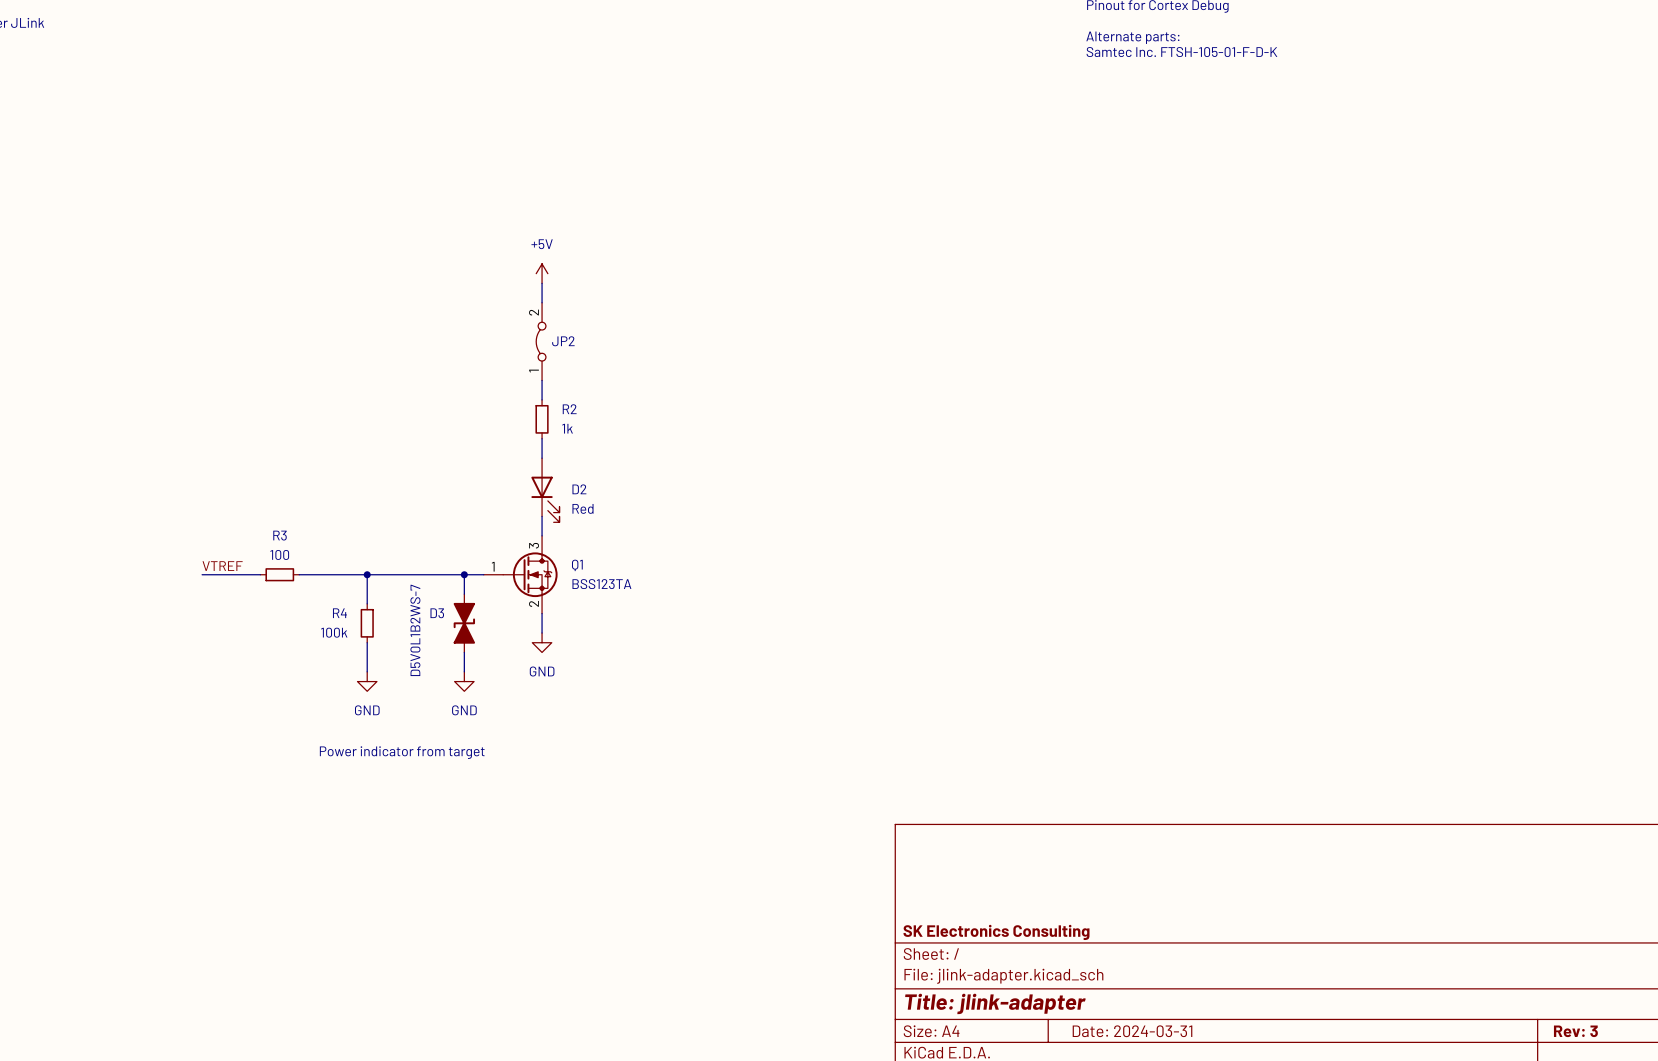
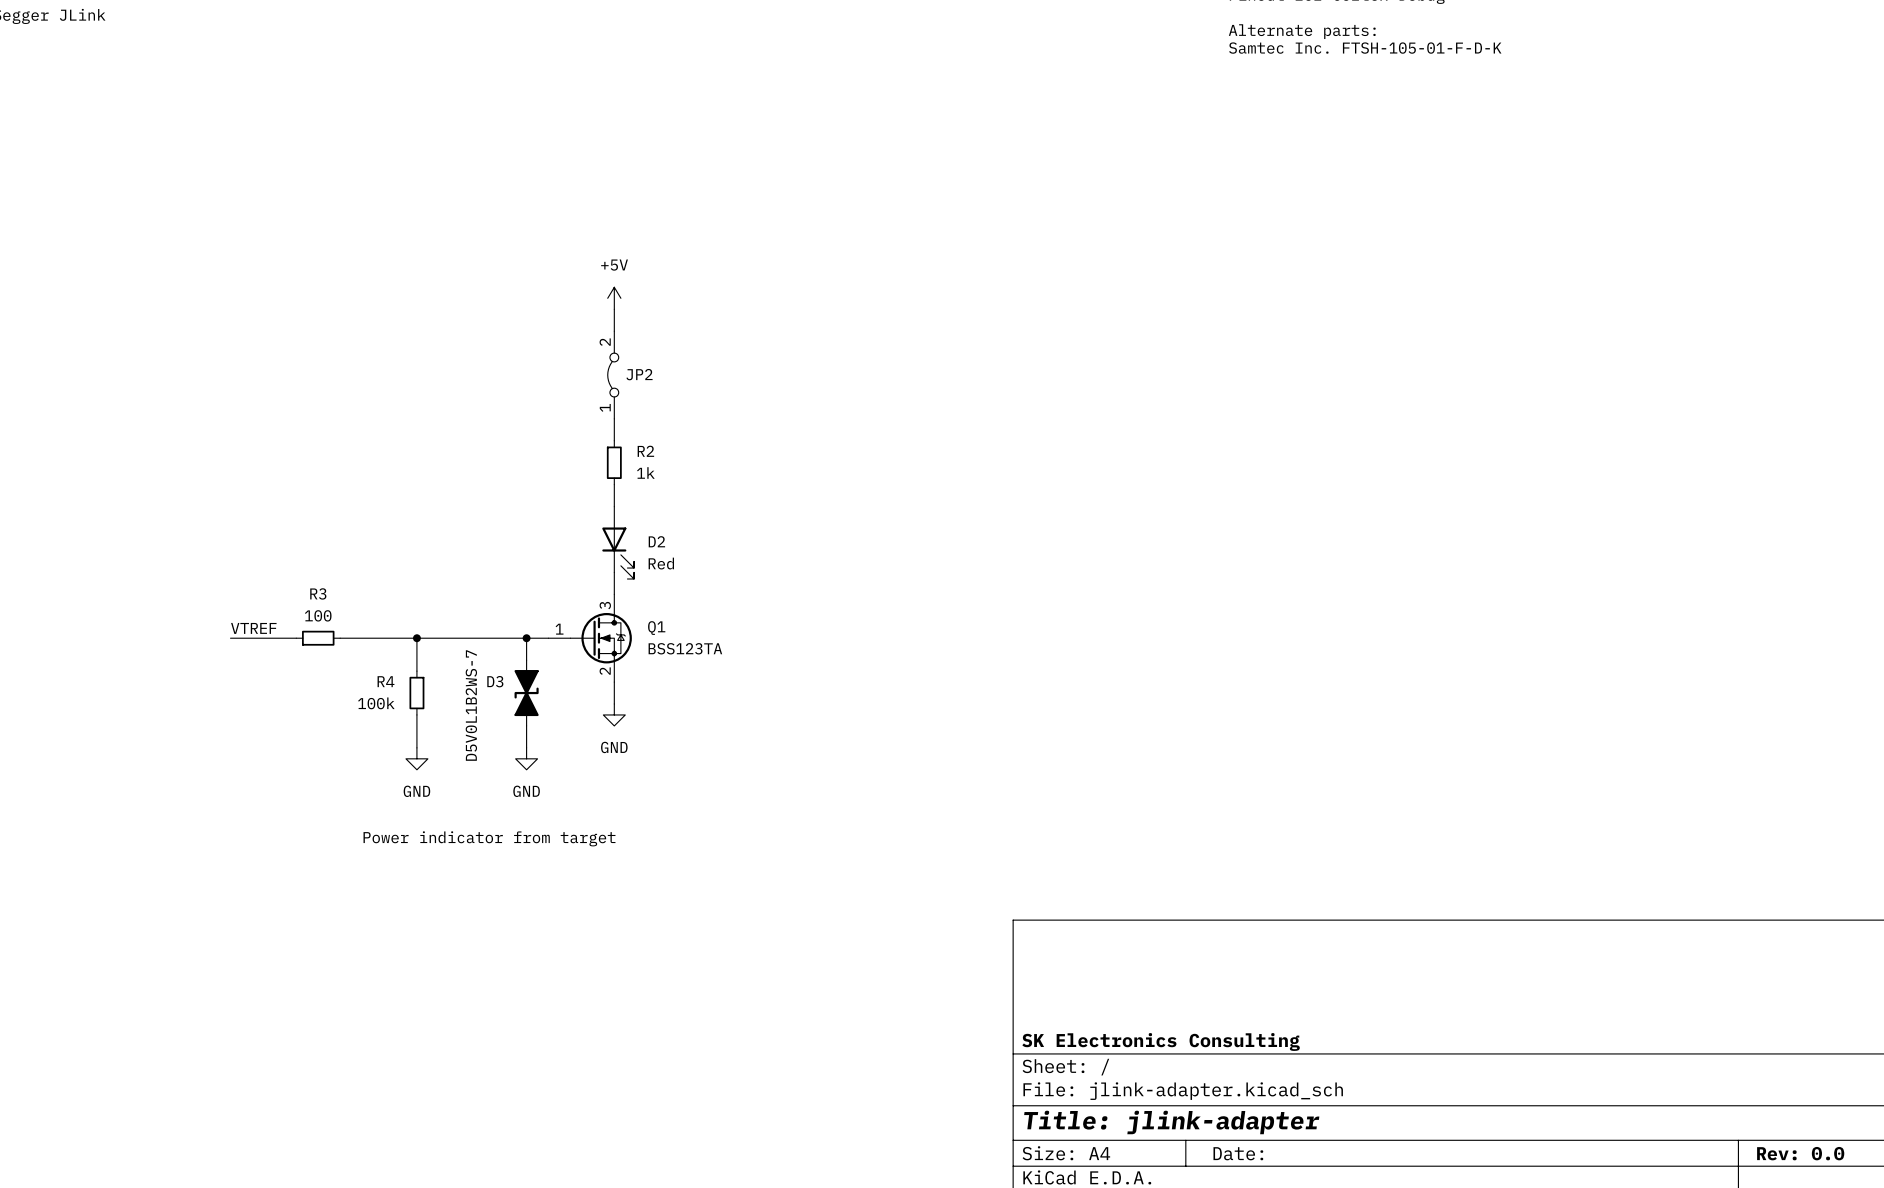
title block: Date: 2024-03-31 (1132, 1031) -> Date: (1238, 1153)
title block: Rev: 3 (1575, 1031) -> Rev: 0.0 (1800, 1153)

